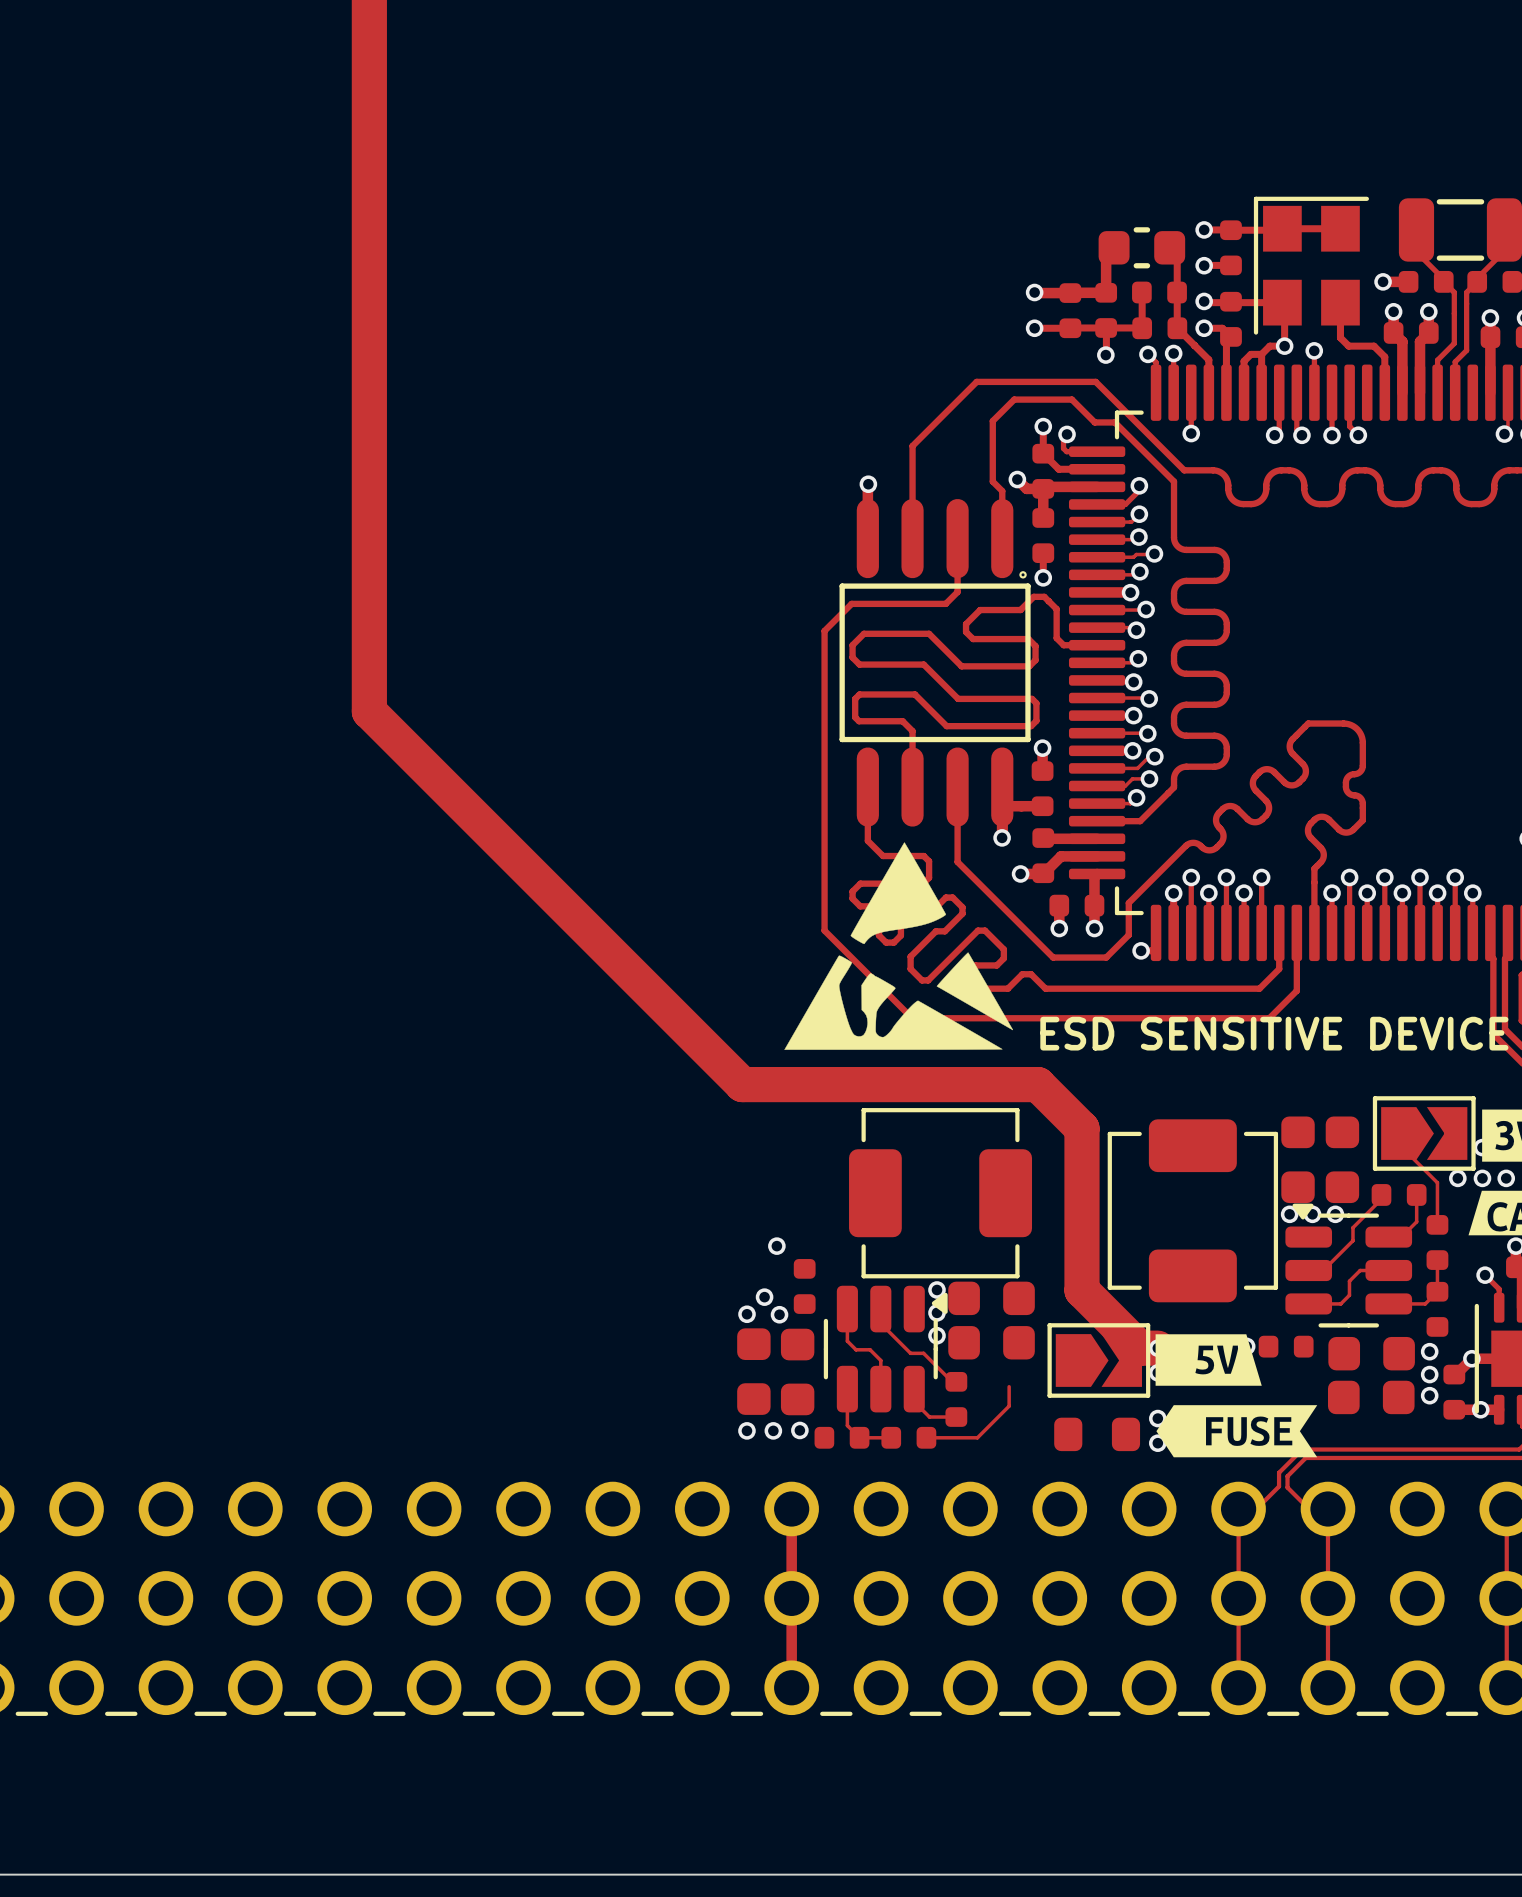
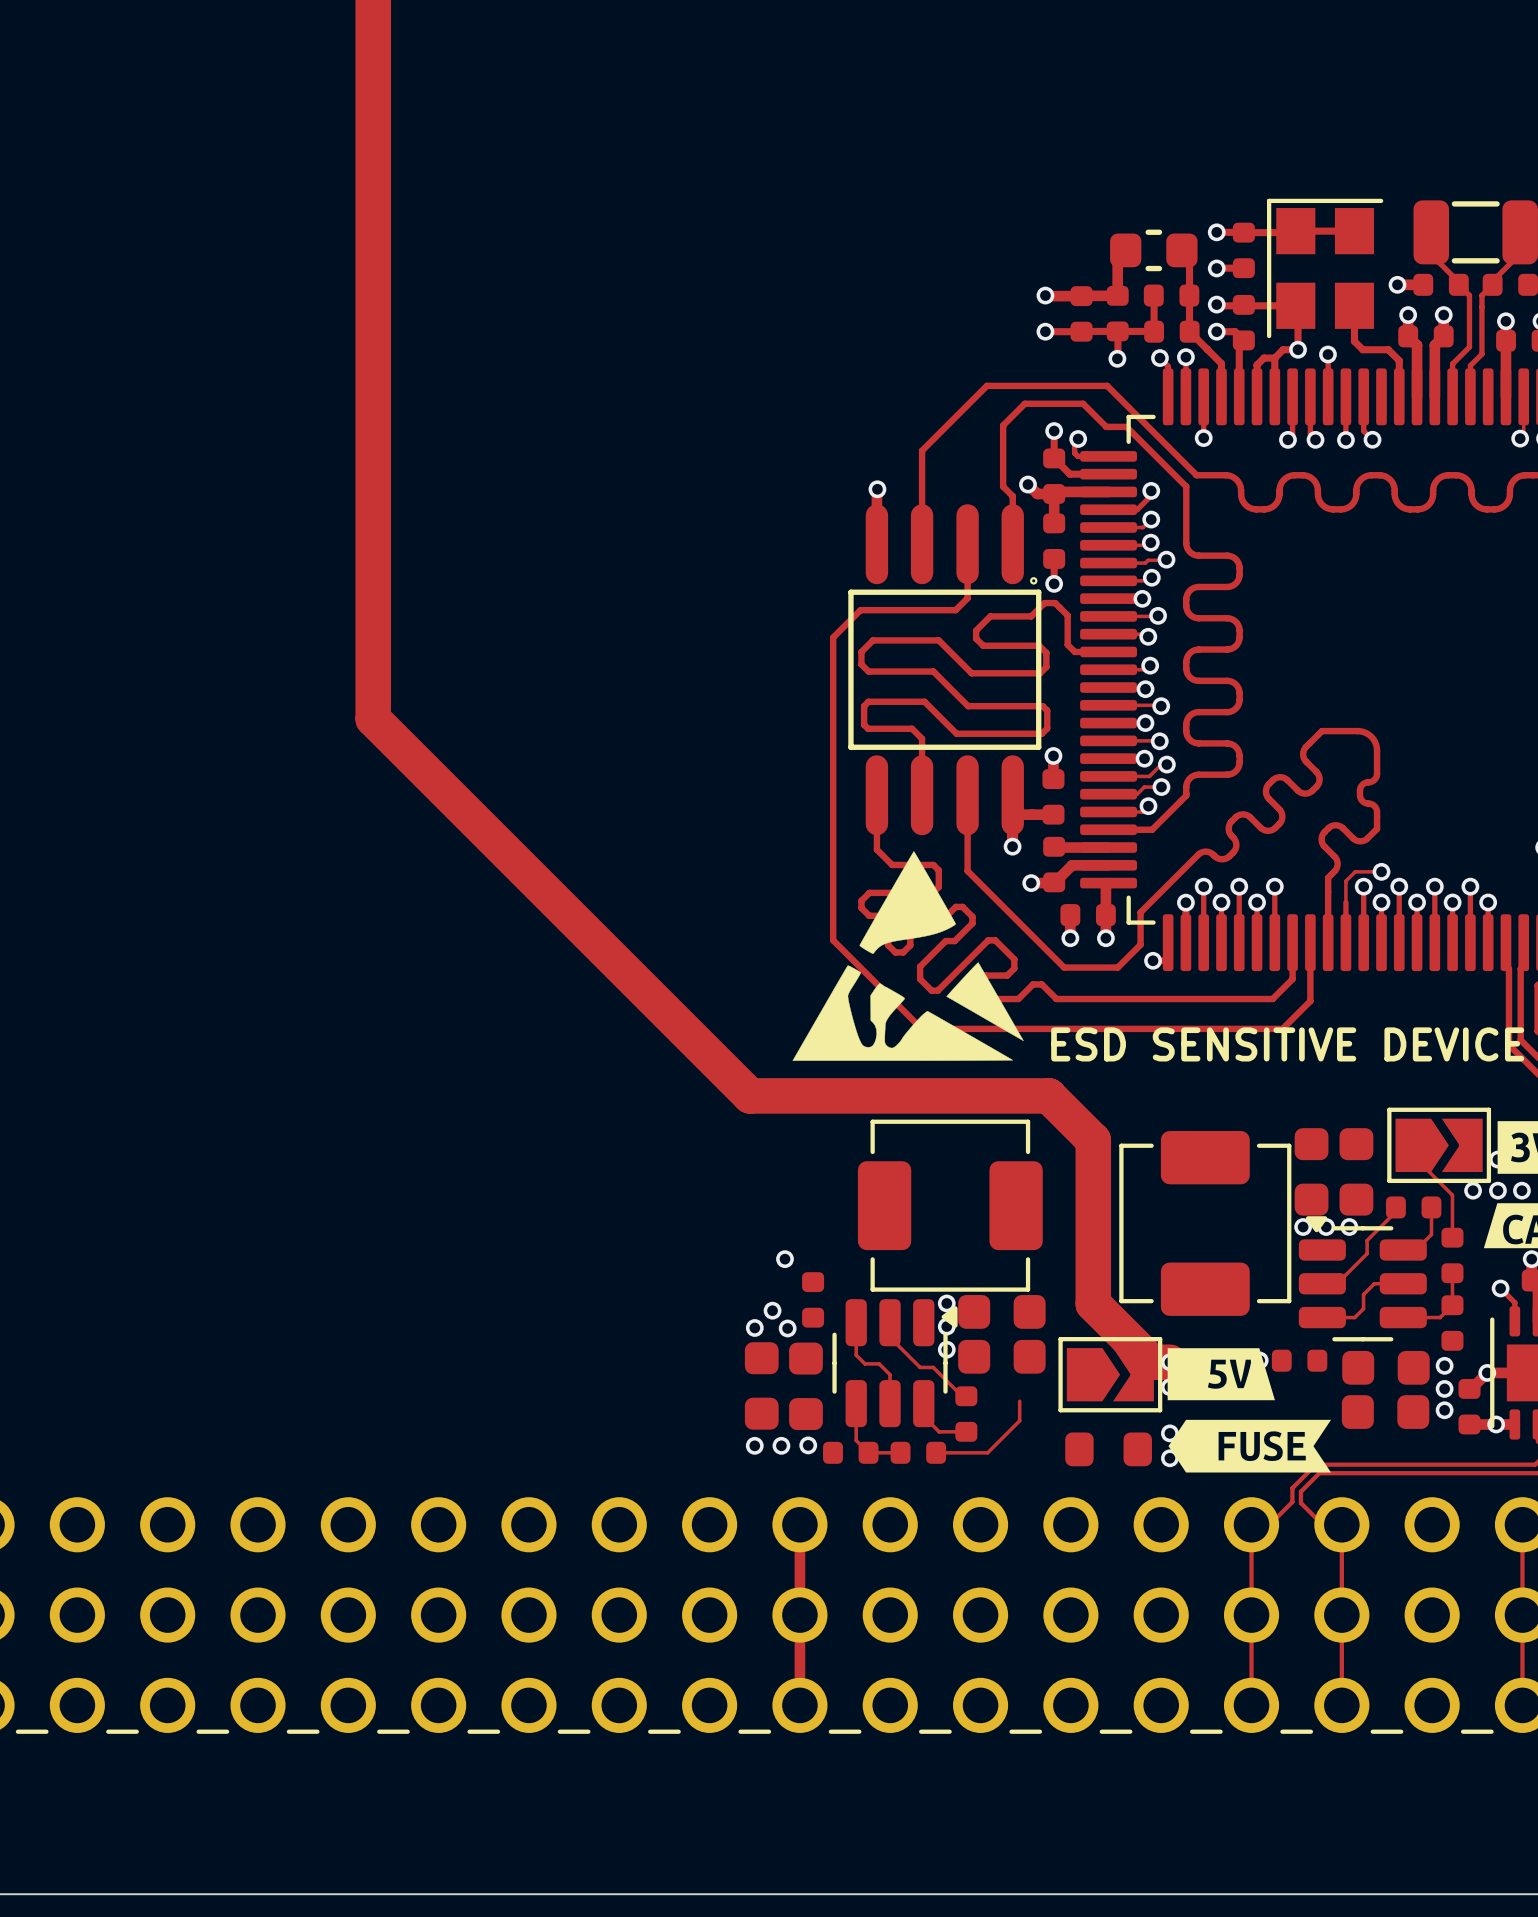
track: none -> (1381, 871) (1355, 871) (1345, 881) (1345, 902)
via position: (1332, 893) -> (1381, 871)

